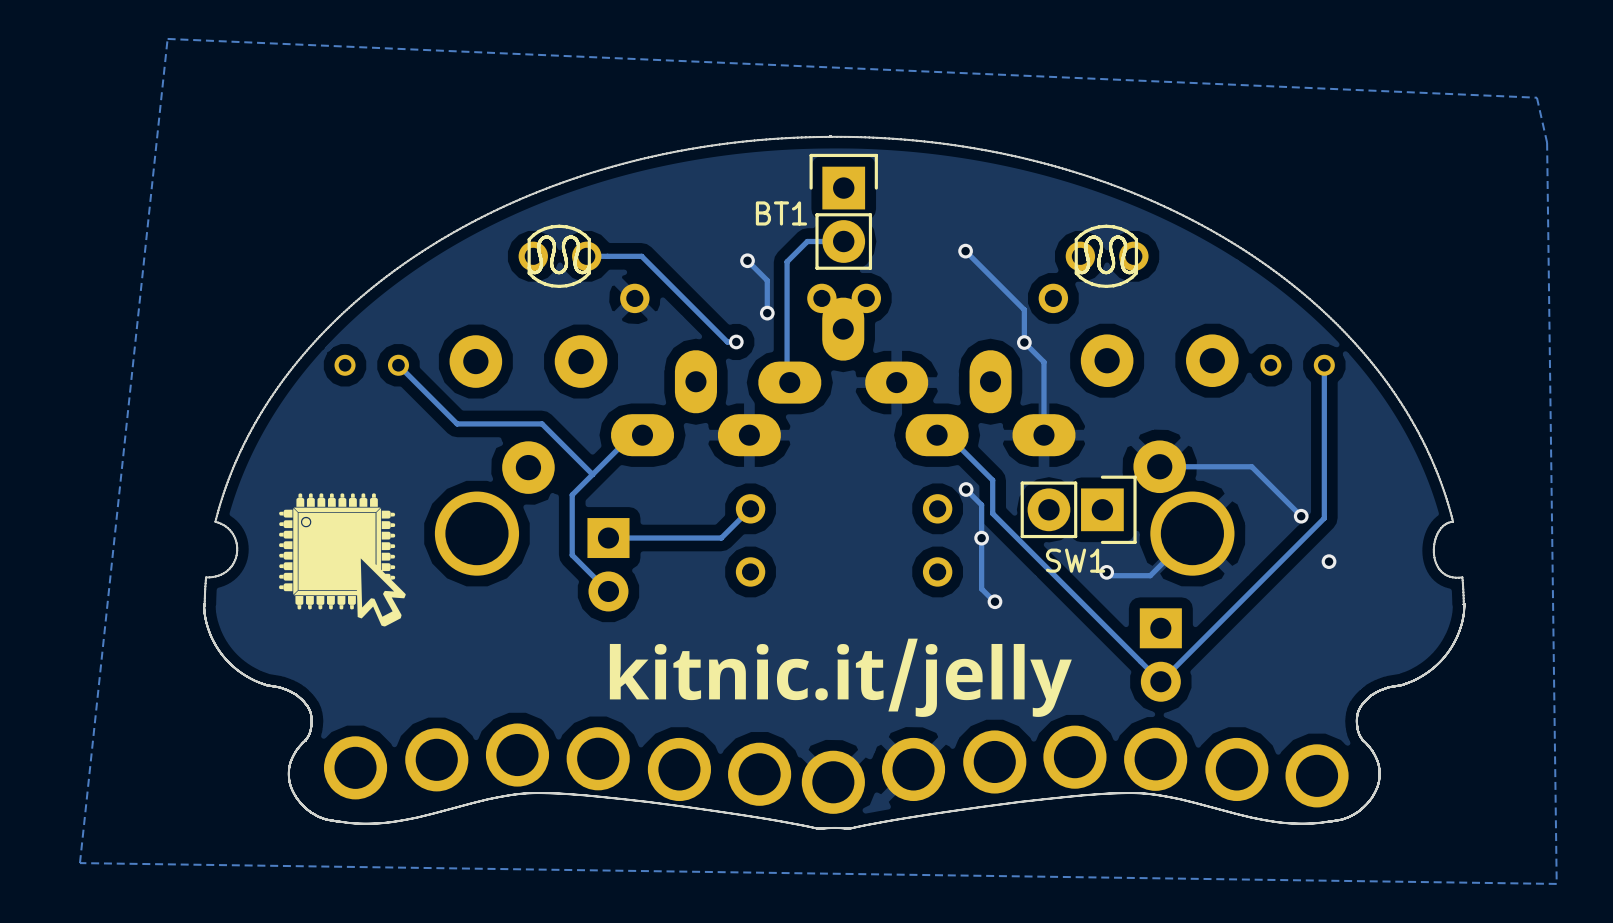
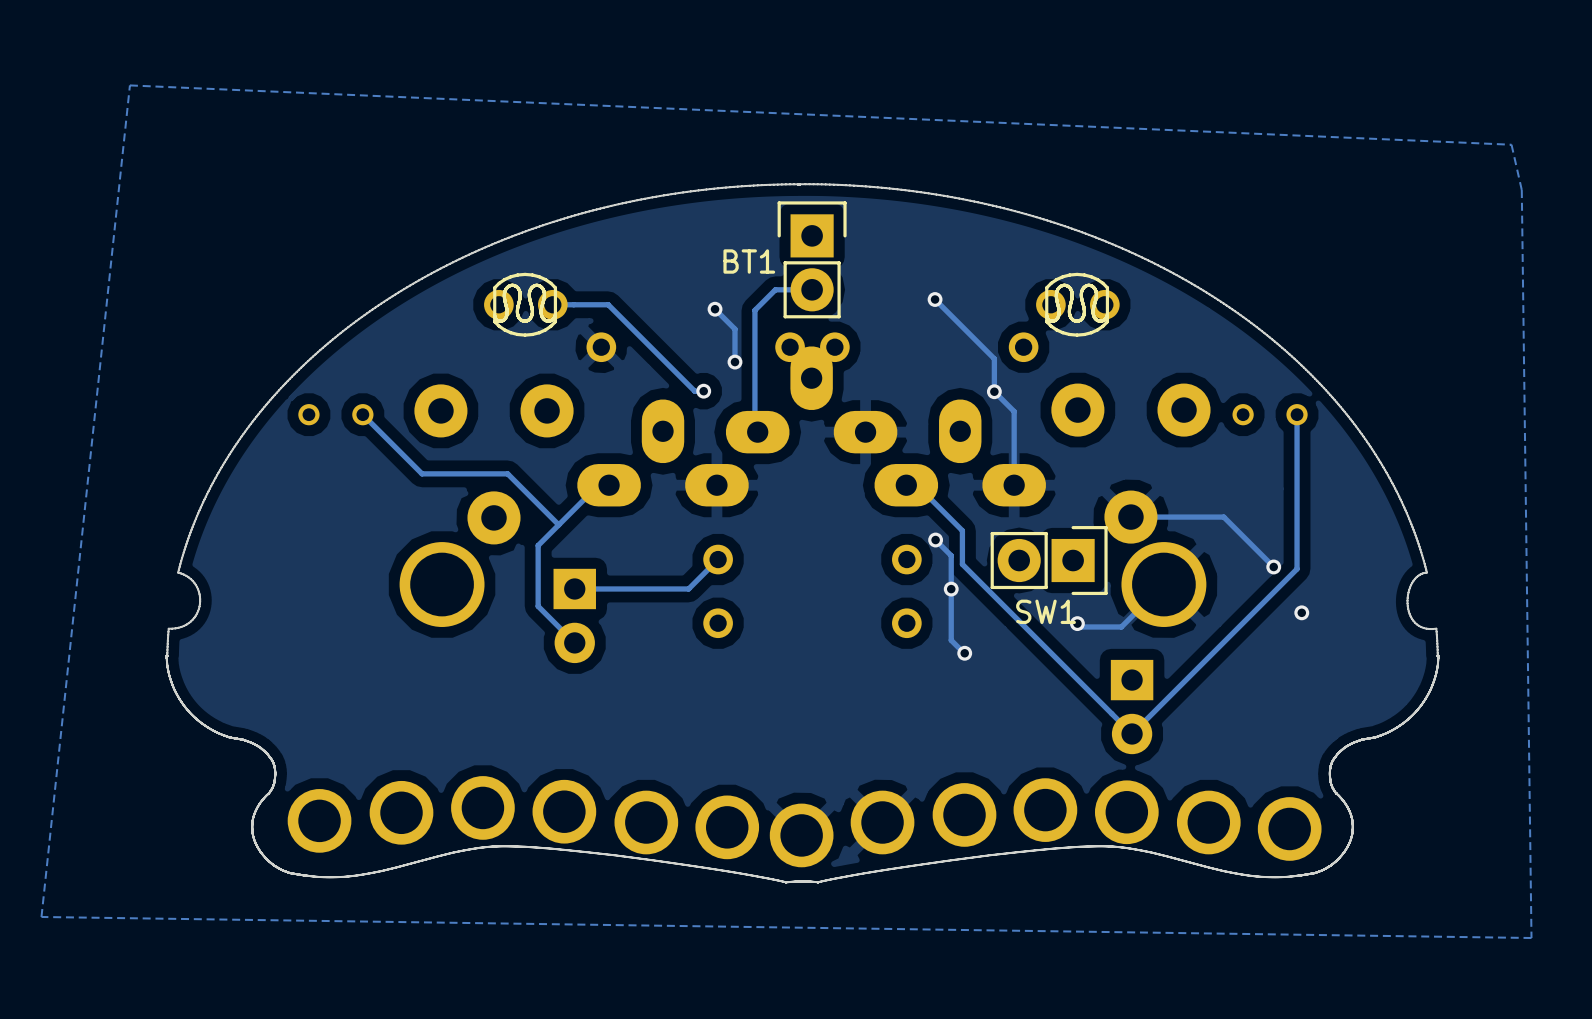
drawing: [279, 493, 406, 627] -> none
drawing: [609, 638, 1072, 717] -> none

